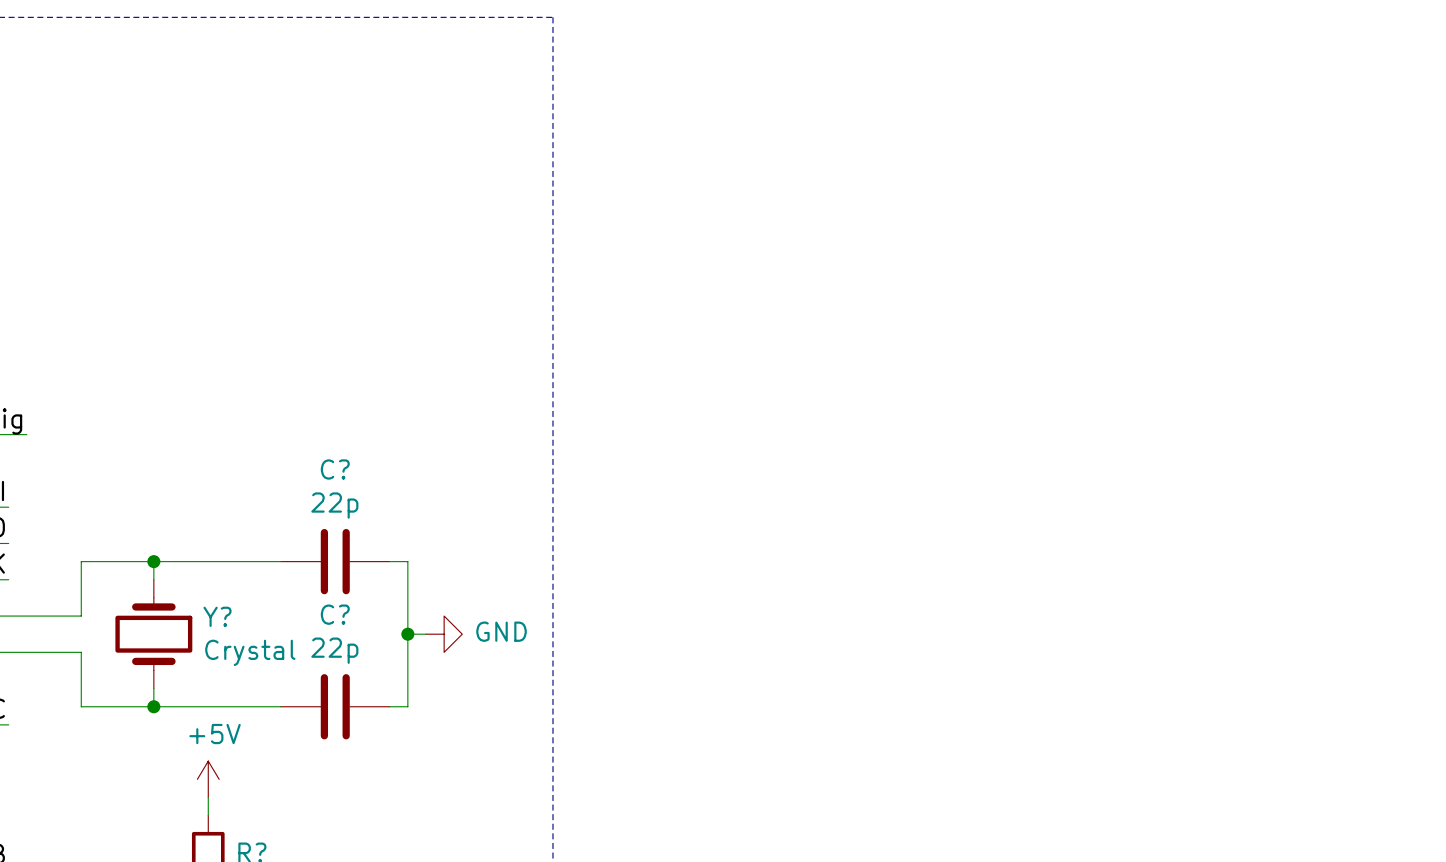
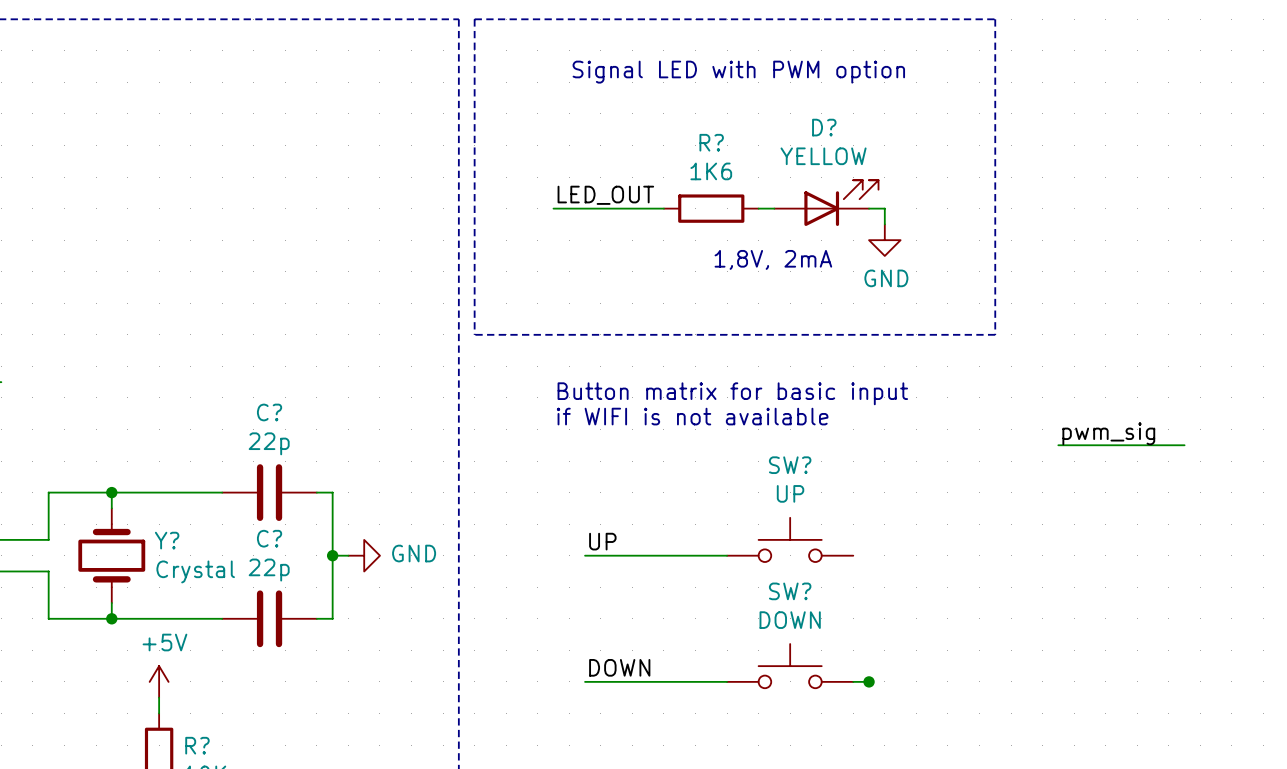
line: none -> (474, 19) (995, 19) (995, 334) (474, 334) (474, 19)
text: none -> Signal LED with PWM option (738, 72)
label: none -> LED_OUT (605, 195)
D?: none -> YELLOW (826, 203)
wire: none -> (553, 208) (663, 208)
R?: none -> 1K6 (711, 208)
wire: none -> (758, 208) (774, 208)
wire: none -> (869, 208) (884, 208) (884, 224)
power symbol: none -> GND (884, 240)
text: none -> 1,8V, 2mA (773, 259)
text: none -> Button matrix for basic input (732, 393)
text: none -> if WIFI is not available (692, 416)
label: none -> pwm_sig (1108, 433)
wire: none -> (1058, 445) (1184, 445)
SW?: none -> UP (790, 539)
label: none -> UP (602, 541)
wire: none -> (585, 555) (727, 555)
SW?: none -> DOWN (790, 666)
label: none -> DOWN (619, 667)
wire: none -> (585, 681) (727, 681)
wire: none -> (853, 681) (869, 681)
junction: none -> (869, 681)

